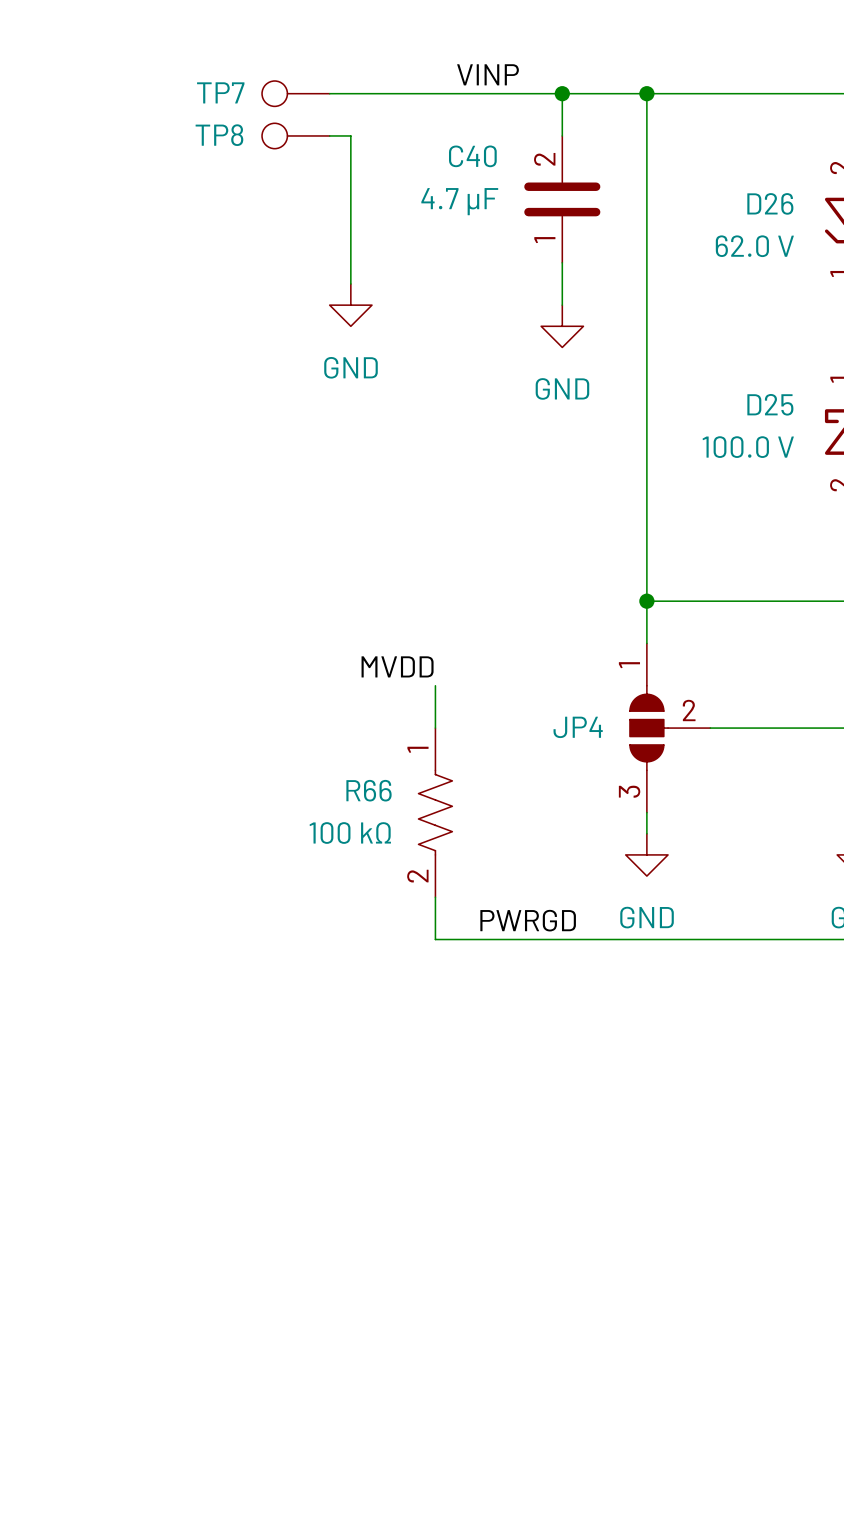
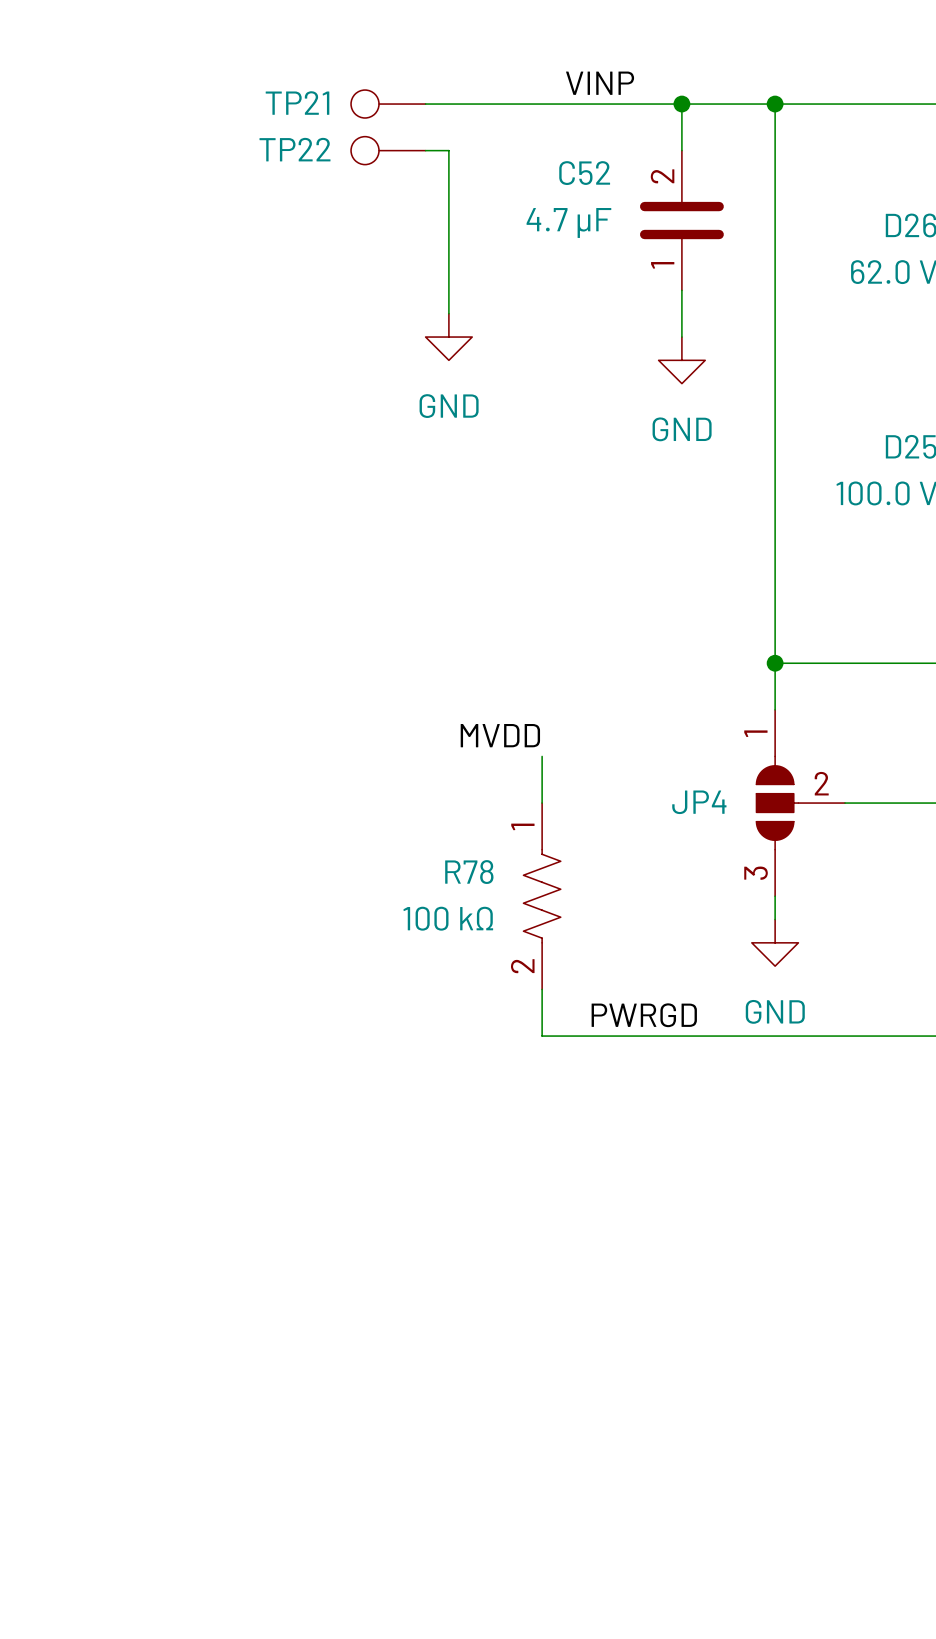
TP7 name: TP7 (220, 92) -> TP21 (297, 103)
TP8 name: TP8 (219, 135) -> TP22 (294, 149)
C40 name: C40 (472, 156) -> C52 (584, 173)
R66 name: R66 (369, 790) -> R78 (469, 872)

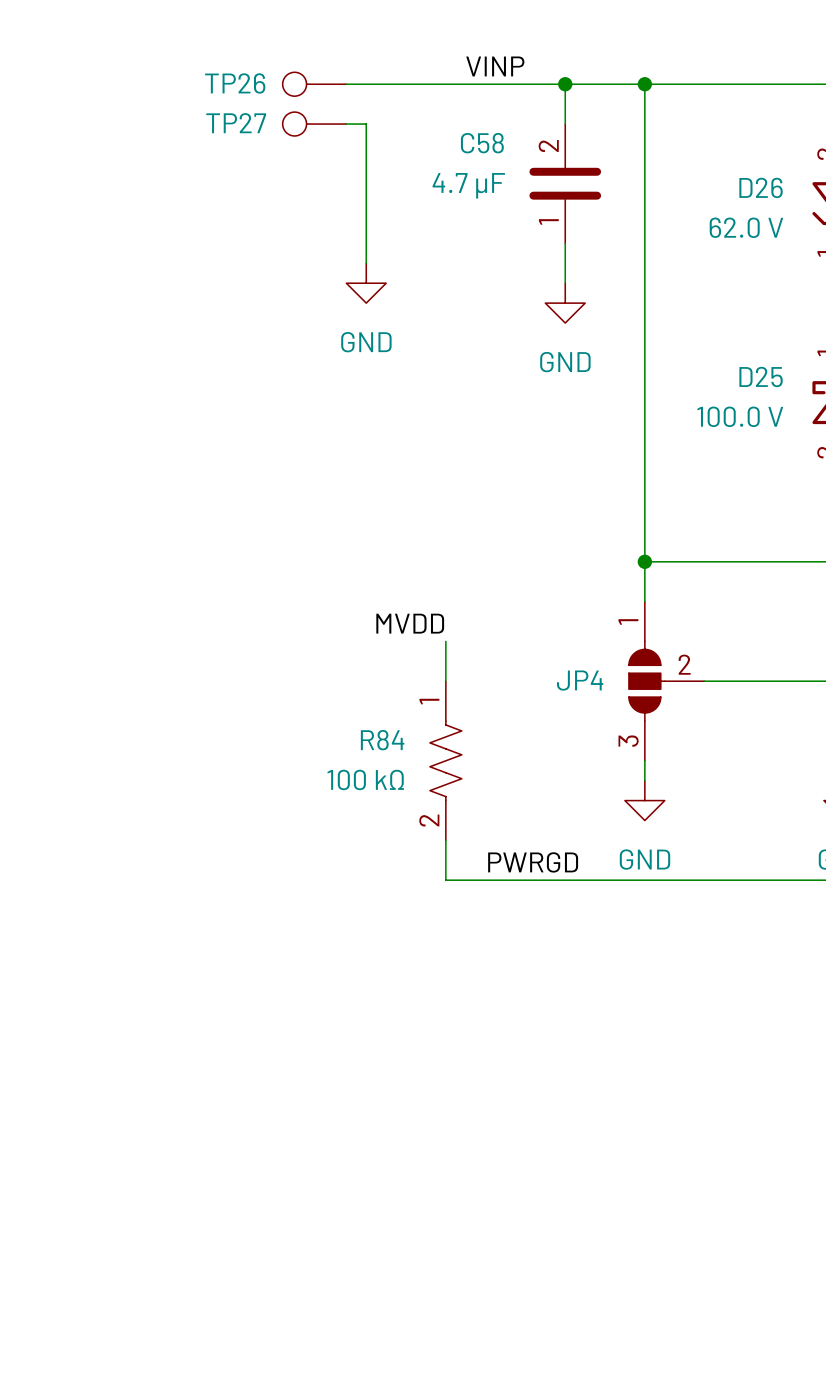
TP21 name: TP21 (297, 103) -> TP26 (235, 83)
TP22 name: TP22 (294, 149) -> TP27 (236, 123)
C52 name: C52 (584, 173) -> C58 (482, 143)
R78 name: R78 (469, 872) -> R84 (382, 740)

